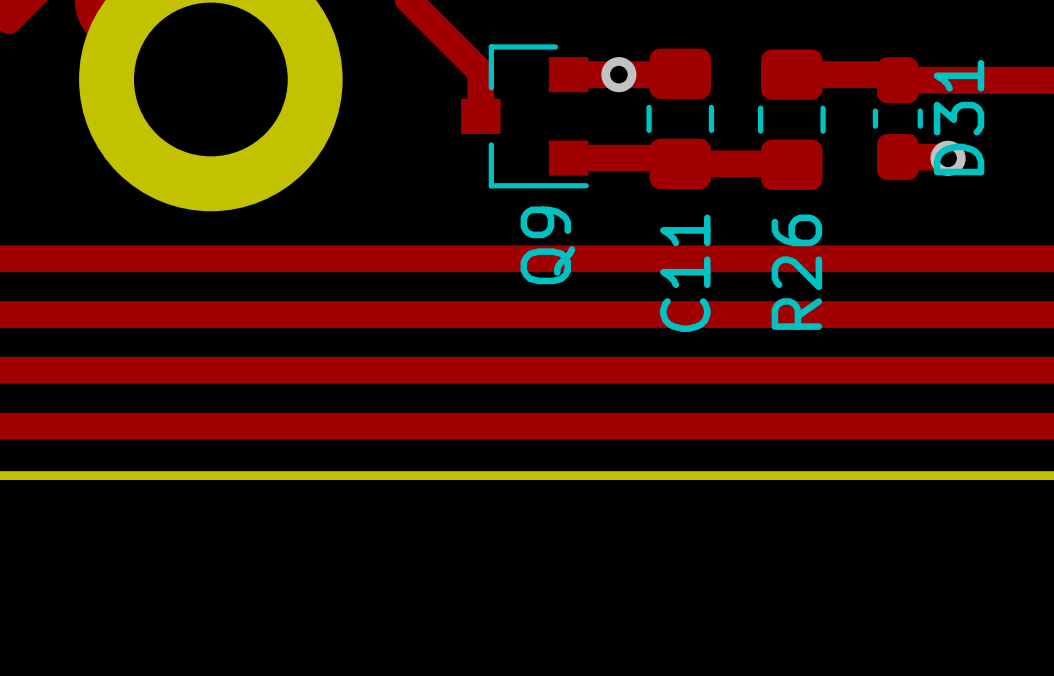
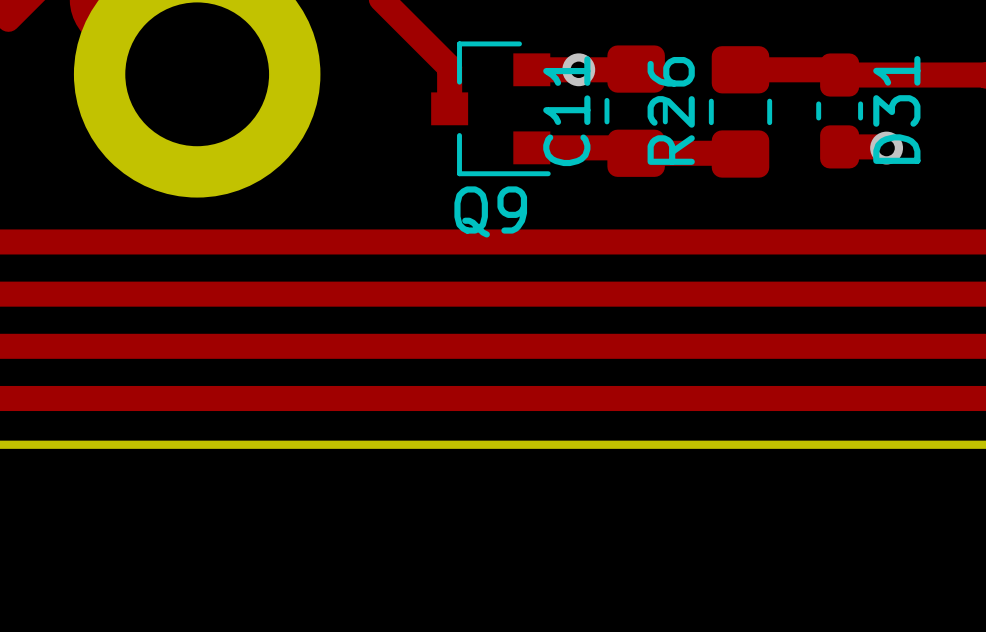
Q9 name rotation: 0° (547, 245) -> 90° clockwise (490, 211)
R26 name position: R26 (796, 272) -> R26 (671, 110)
C11 name position: C11 (685, 273) -> C11 (566, 111)

